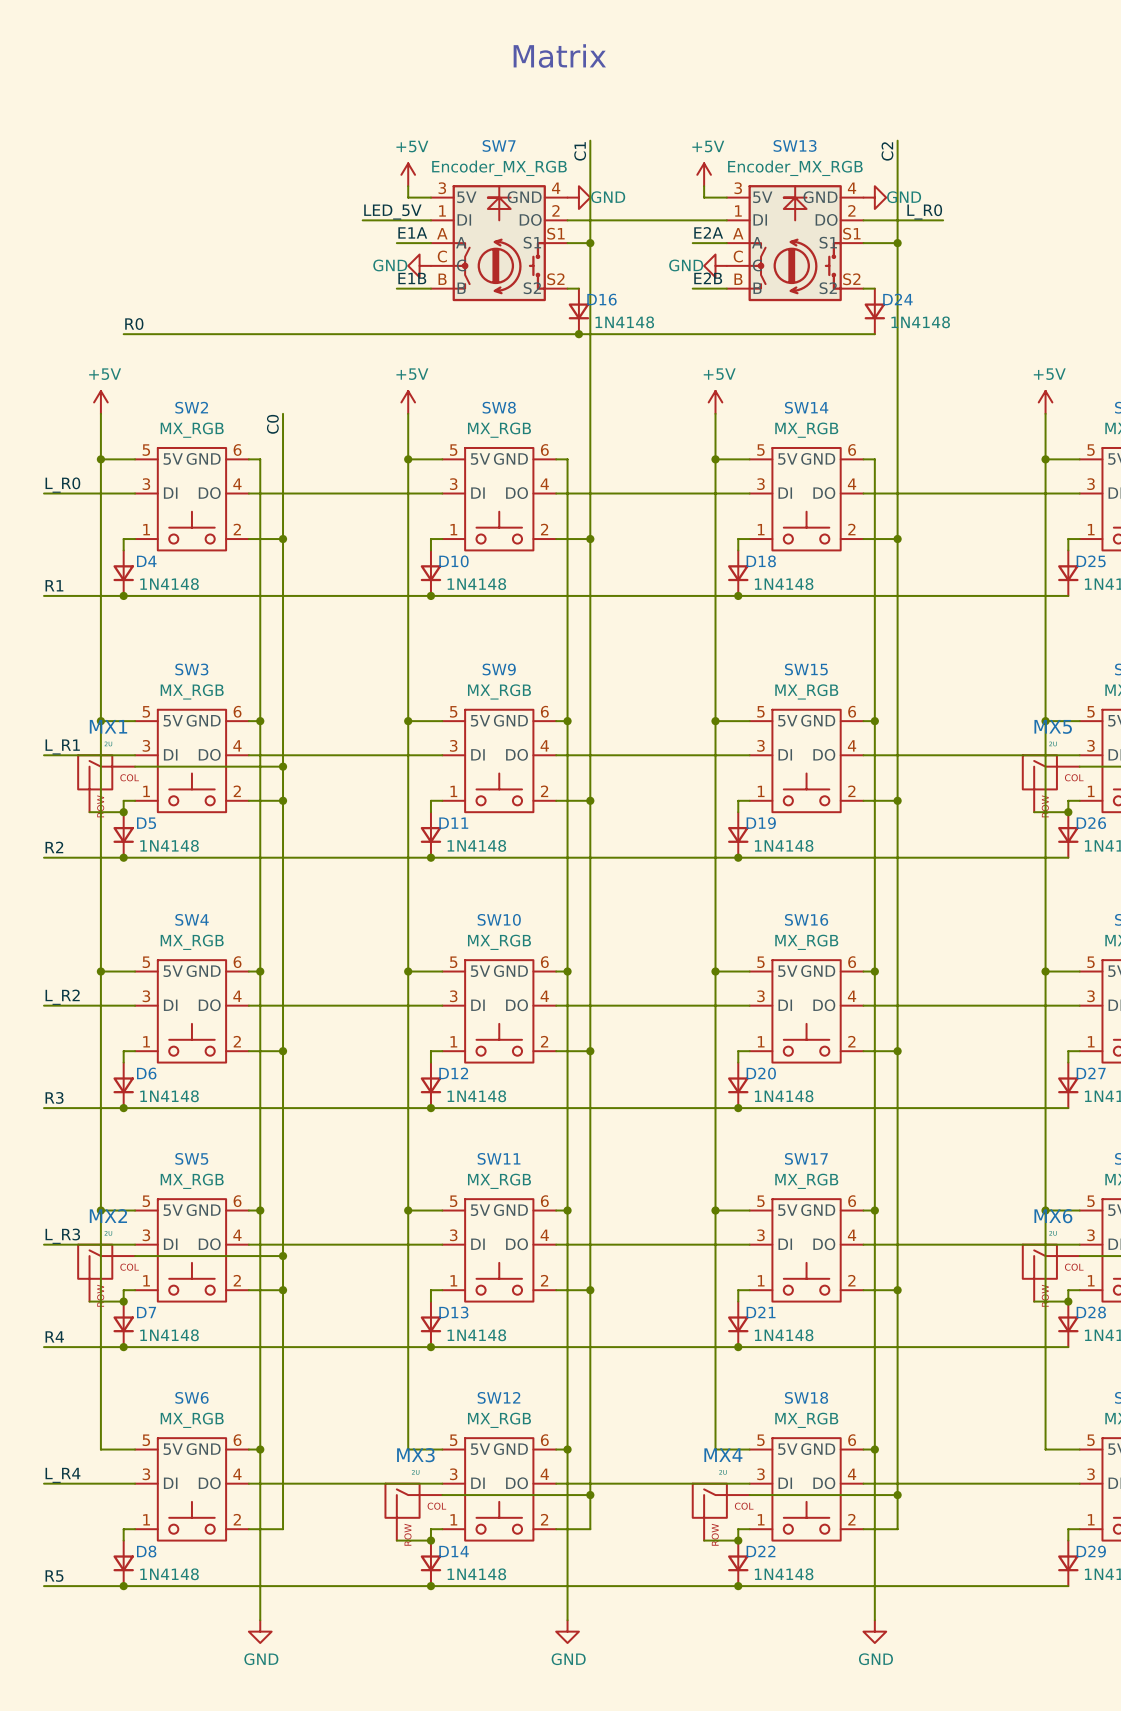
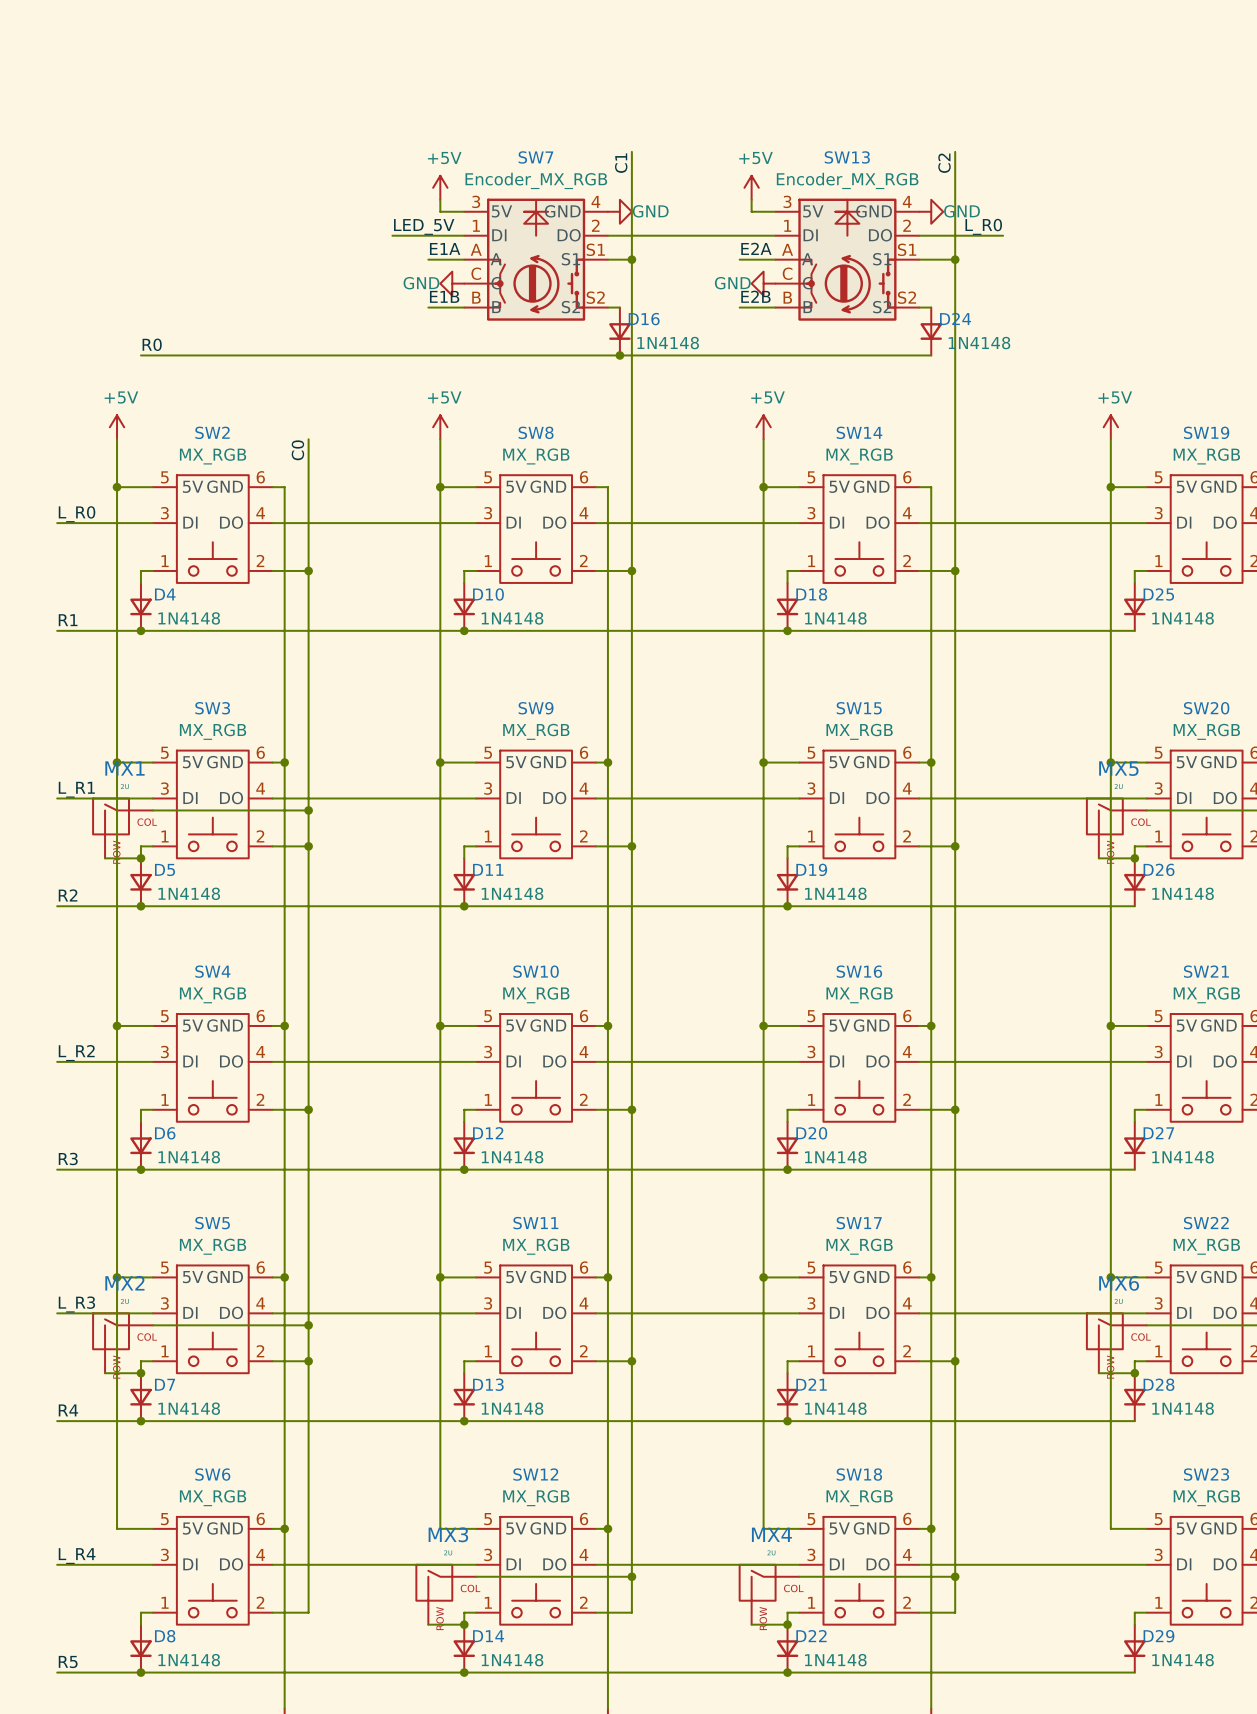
text: Matrix (559, 56) -> none

